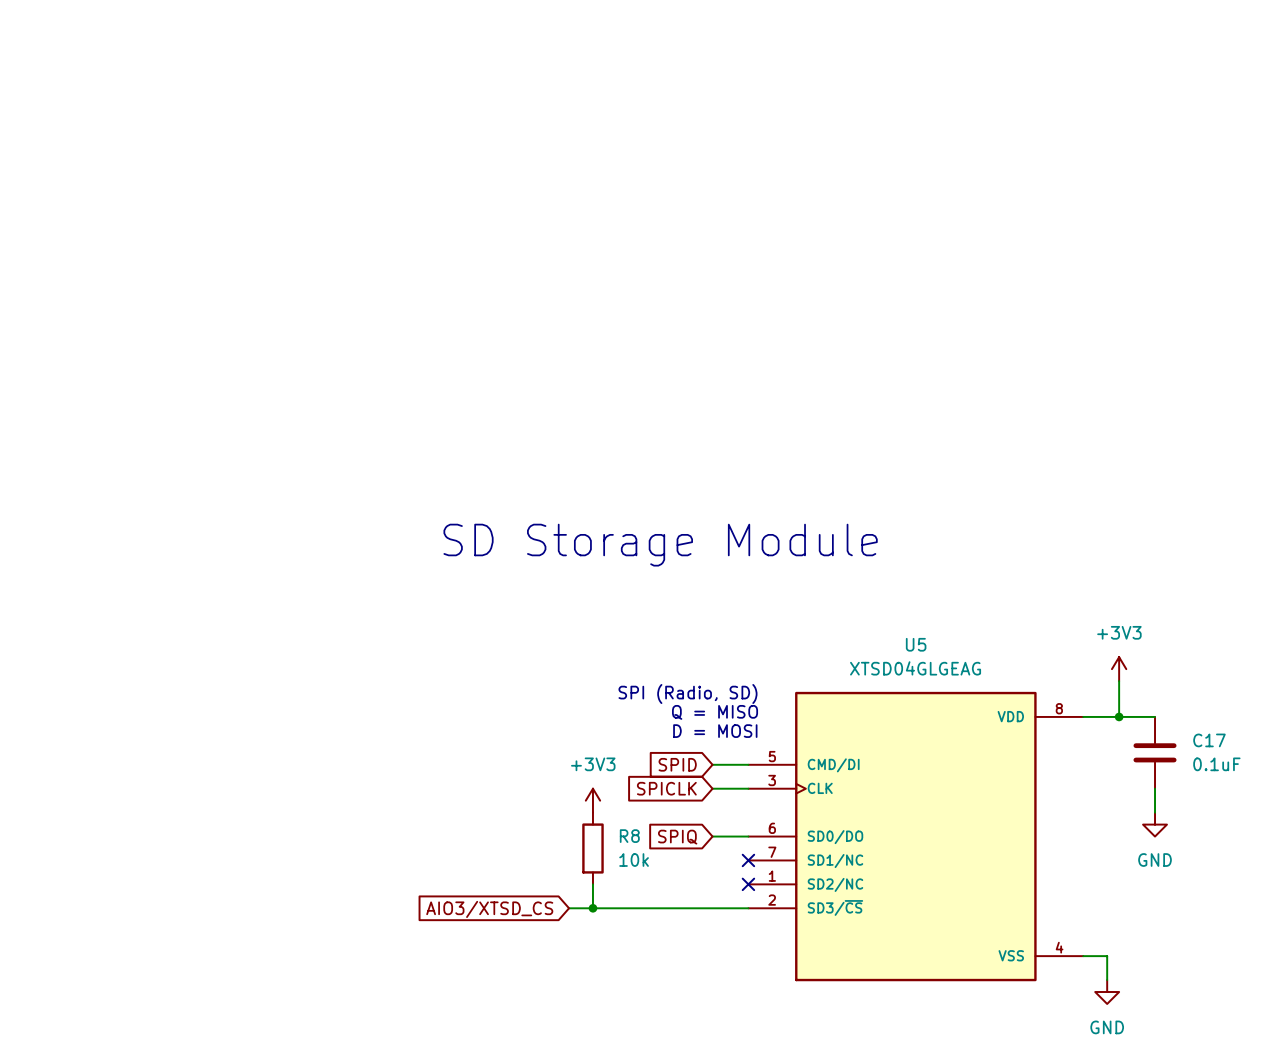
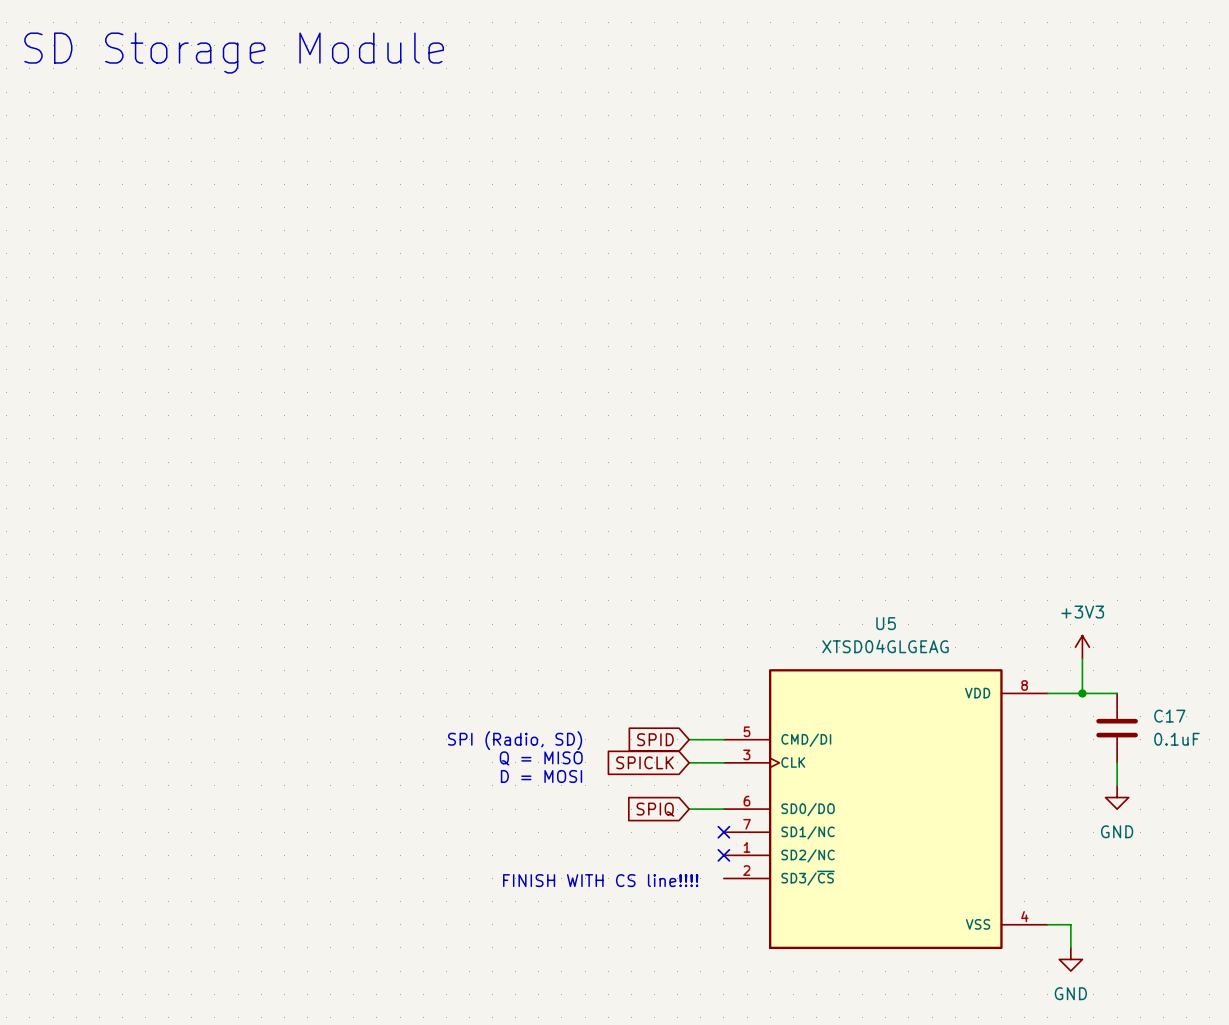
text: none -> SD Storage Module (234, 53)
text: SD Storage Module (660, 545) -> none
text position: SPI (Radio, SD) (687, 694) -> SPI (Radio, SD) (515, 740)
text position: Q = MISO (715, 712) -> Q = MISO (541, 758)
text position: D = MOSI (715, 731) -> D = MOSI (541, 776)
power symbol: +3V3 (592, 800) -> none
R8: 10k (592, 848) -> none
wire: (592, 884) (592, 908) -> none
wire: (569, 908) (748, 908) -> none
junction: (592, 908) -> none
global label: AIO3/XTSD_CS (489, 909) -> none
text: none -> FINISH WITH CS line!!!! (600, 880)

